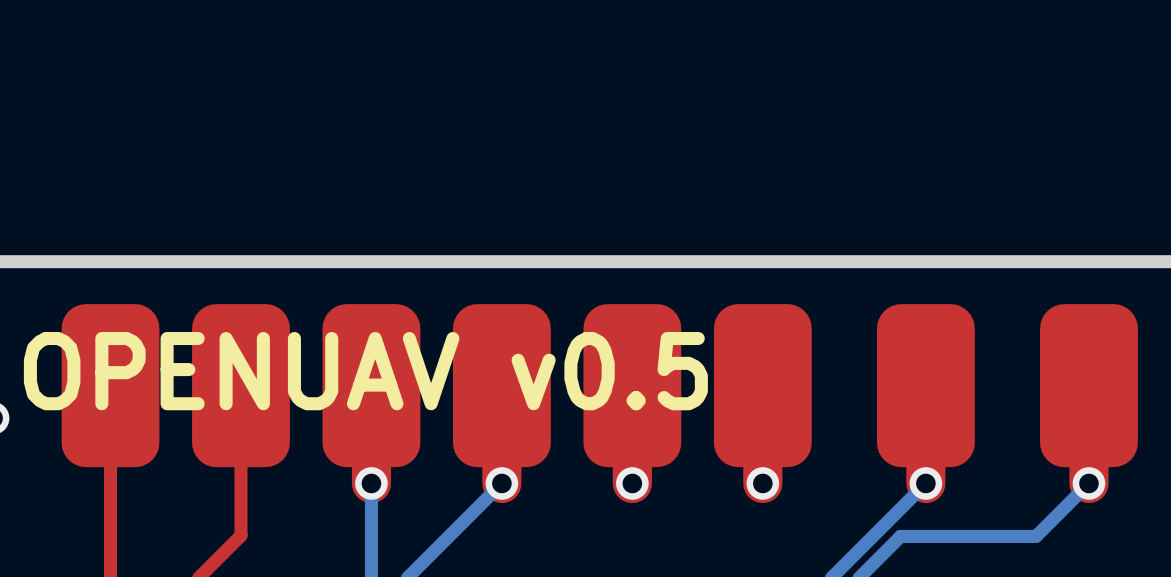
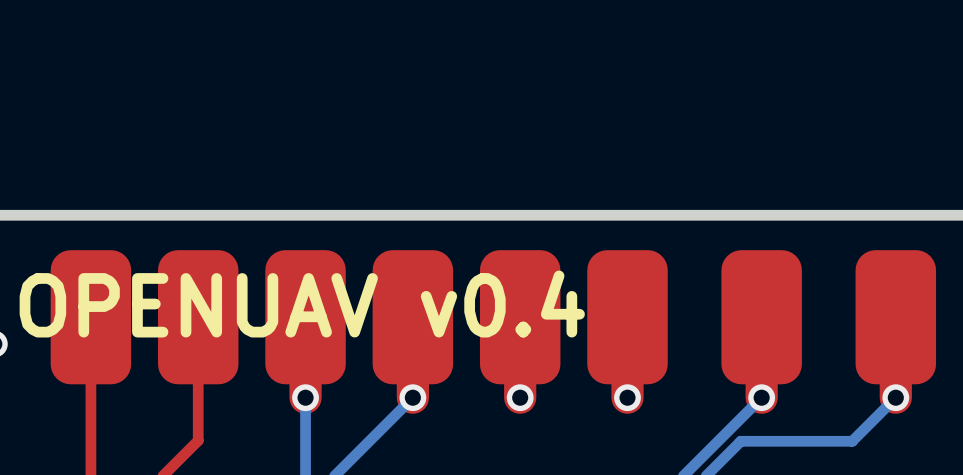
text: OPENUAV v0.5 (365, 371) -> OPENUAV v0.4 (302, 304)

